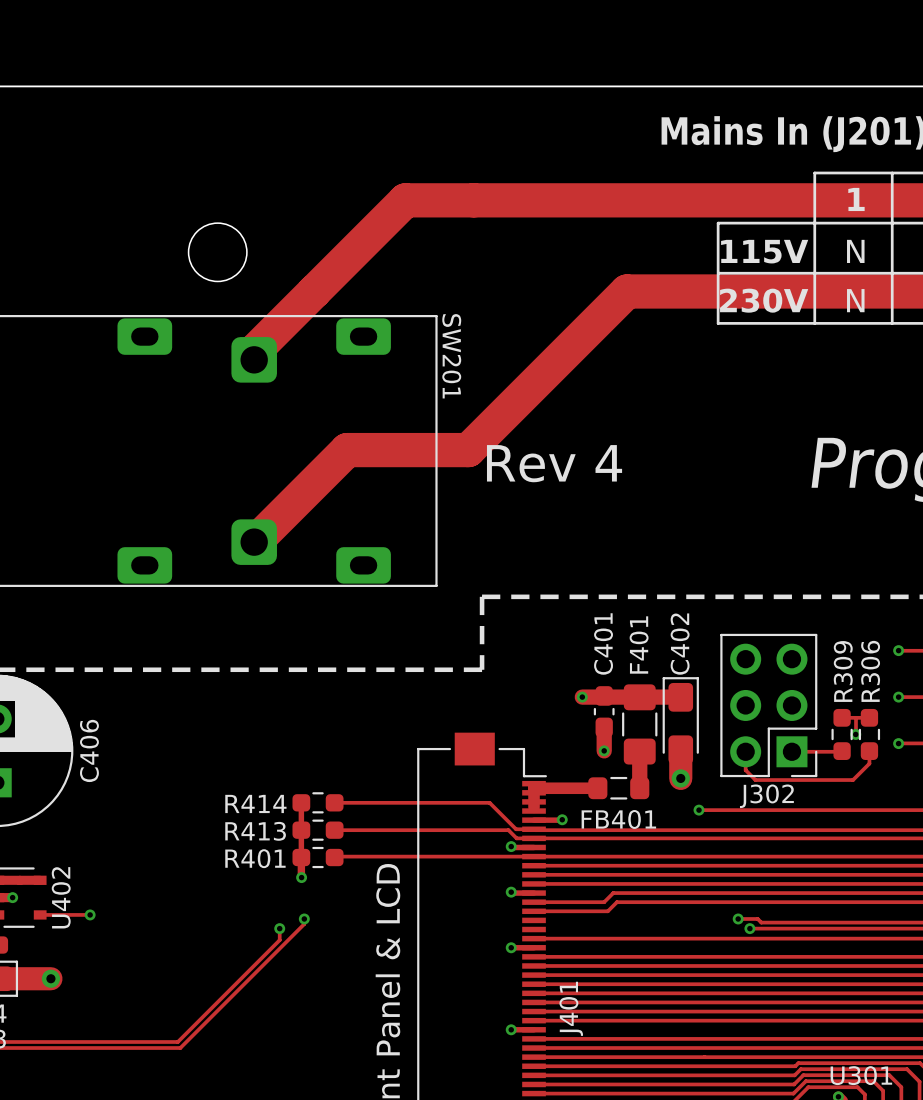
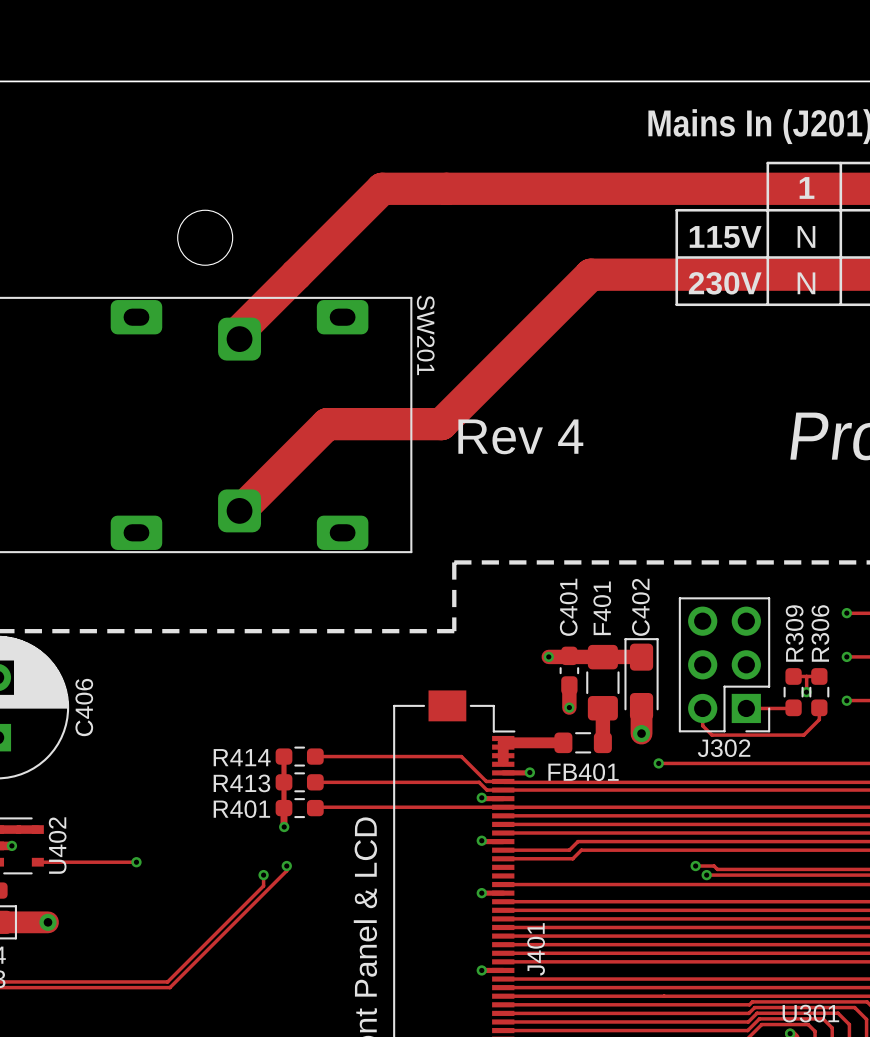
track: none -> (84, 862) (136, 862)
via position: (90, 914) -> (136, 862)

